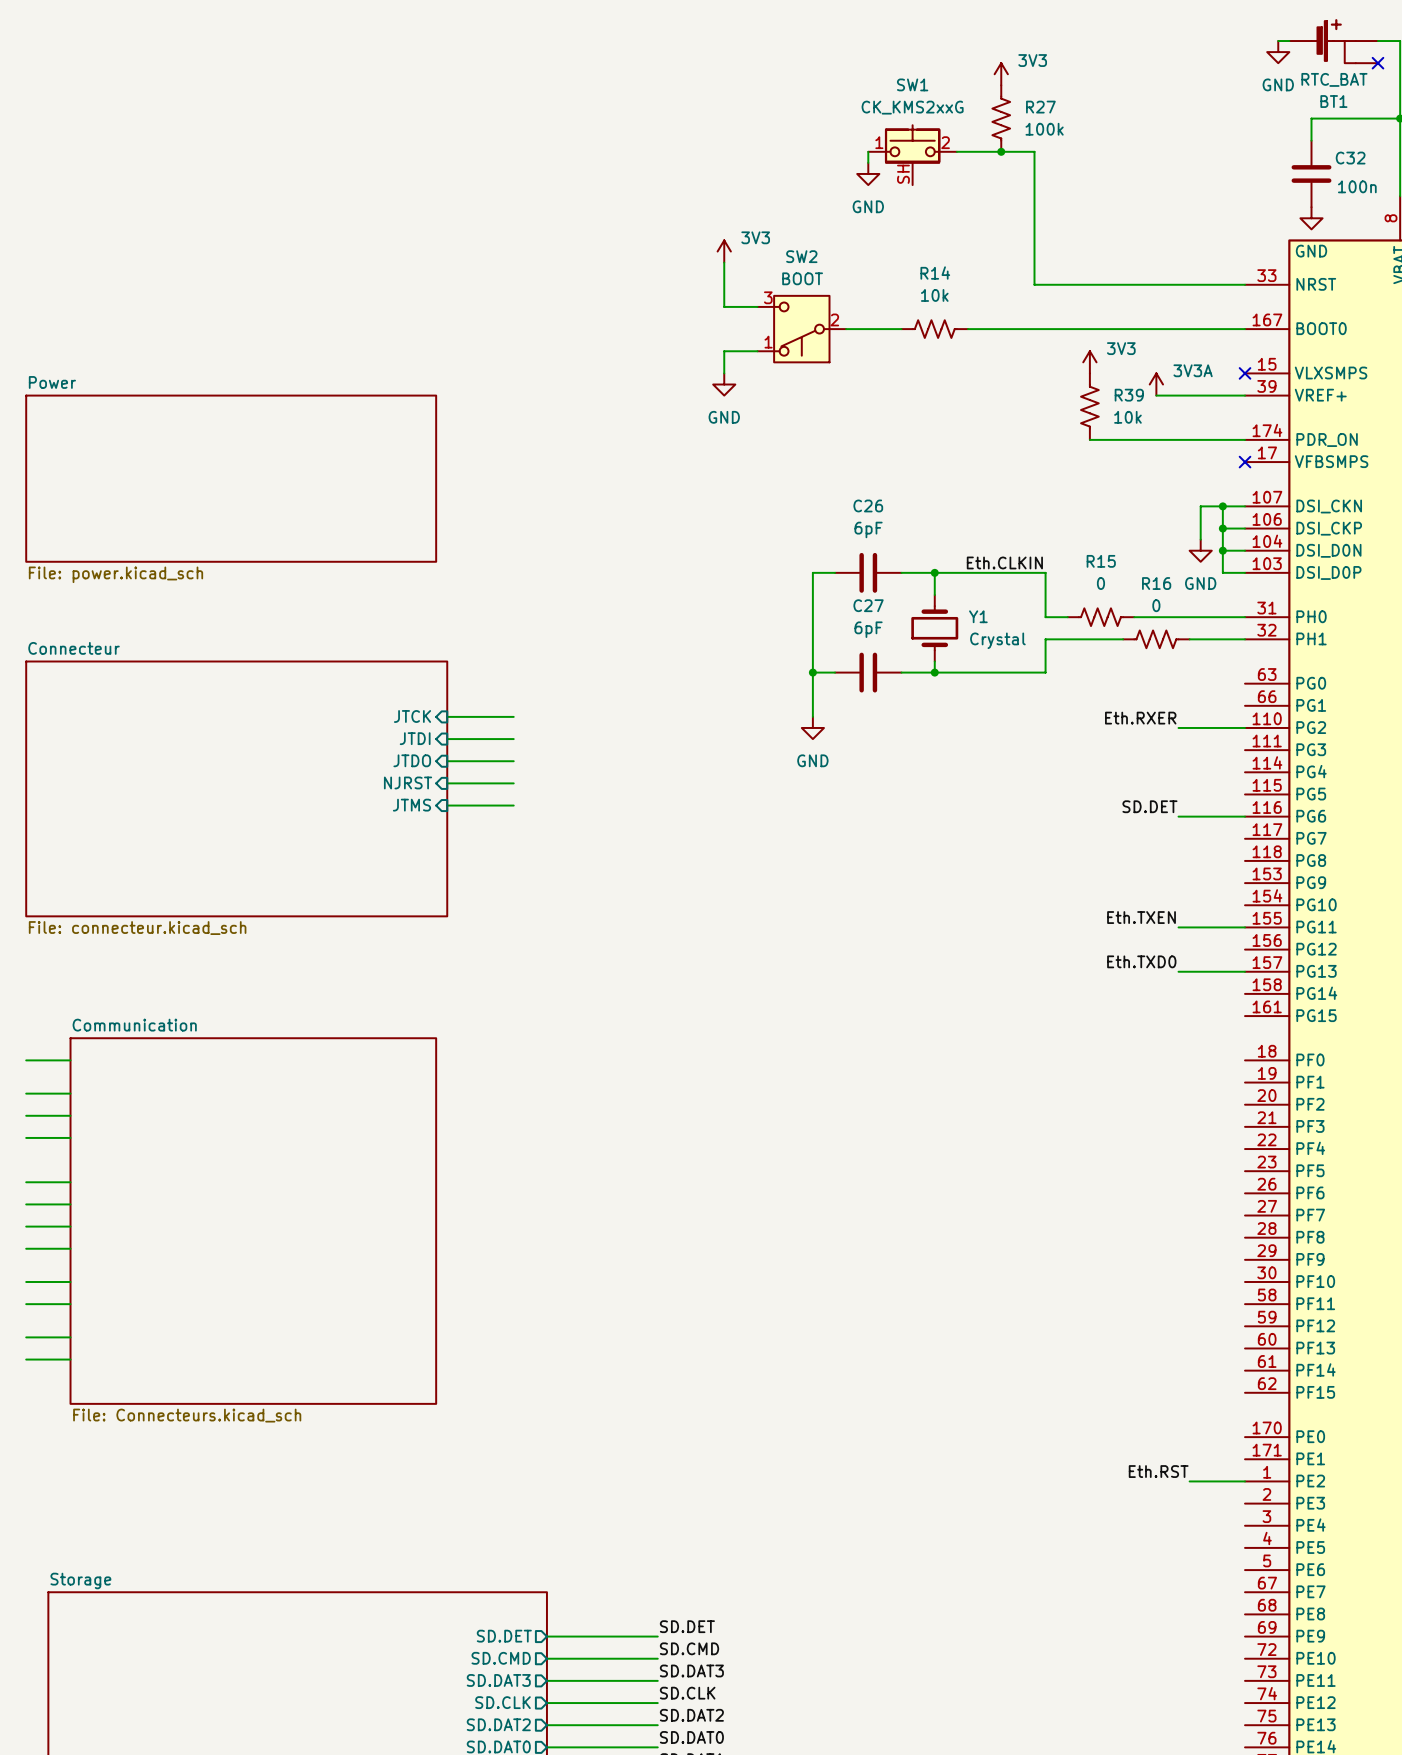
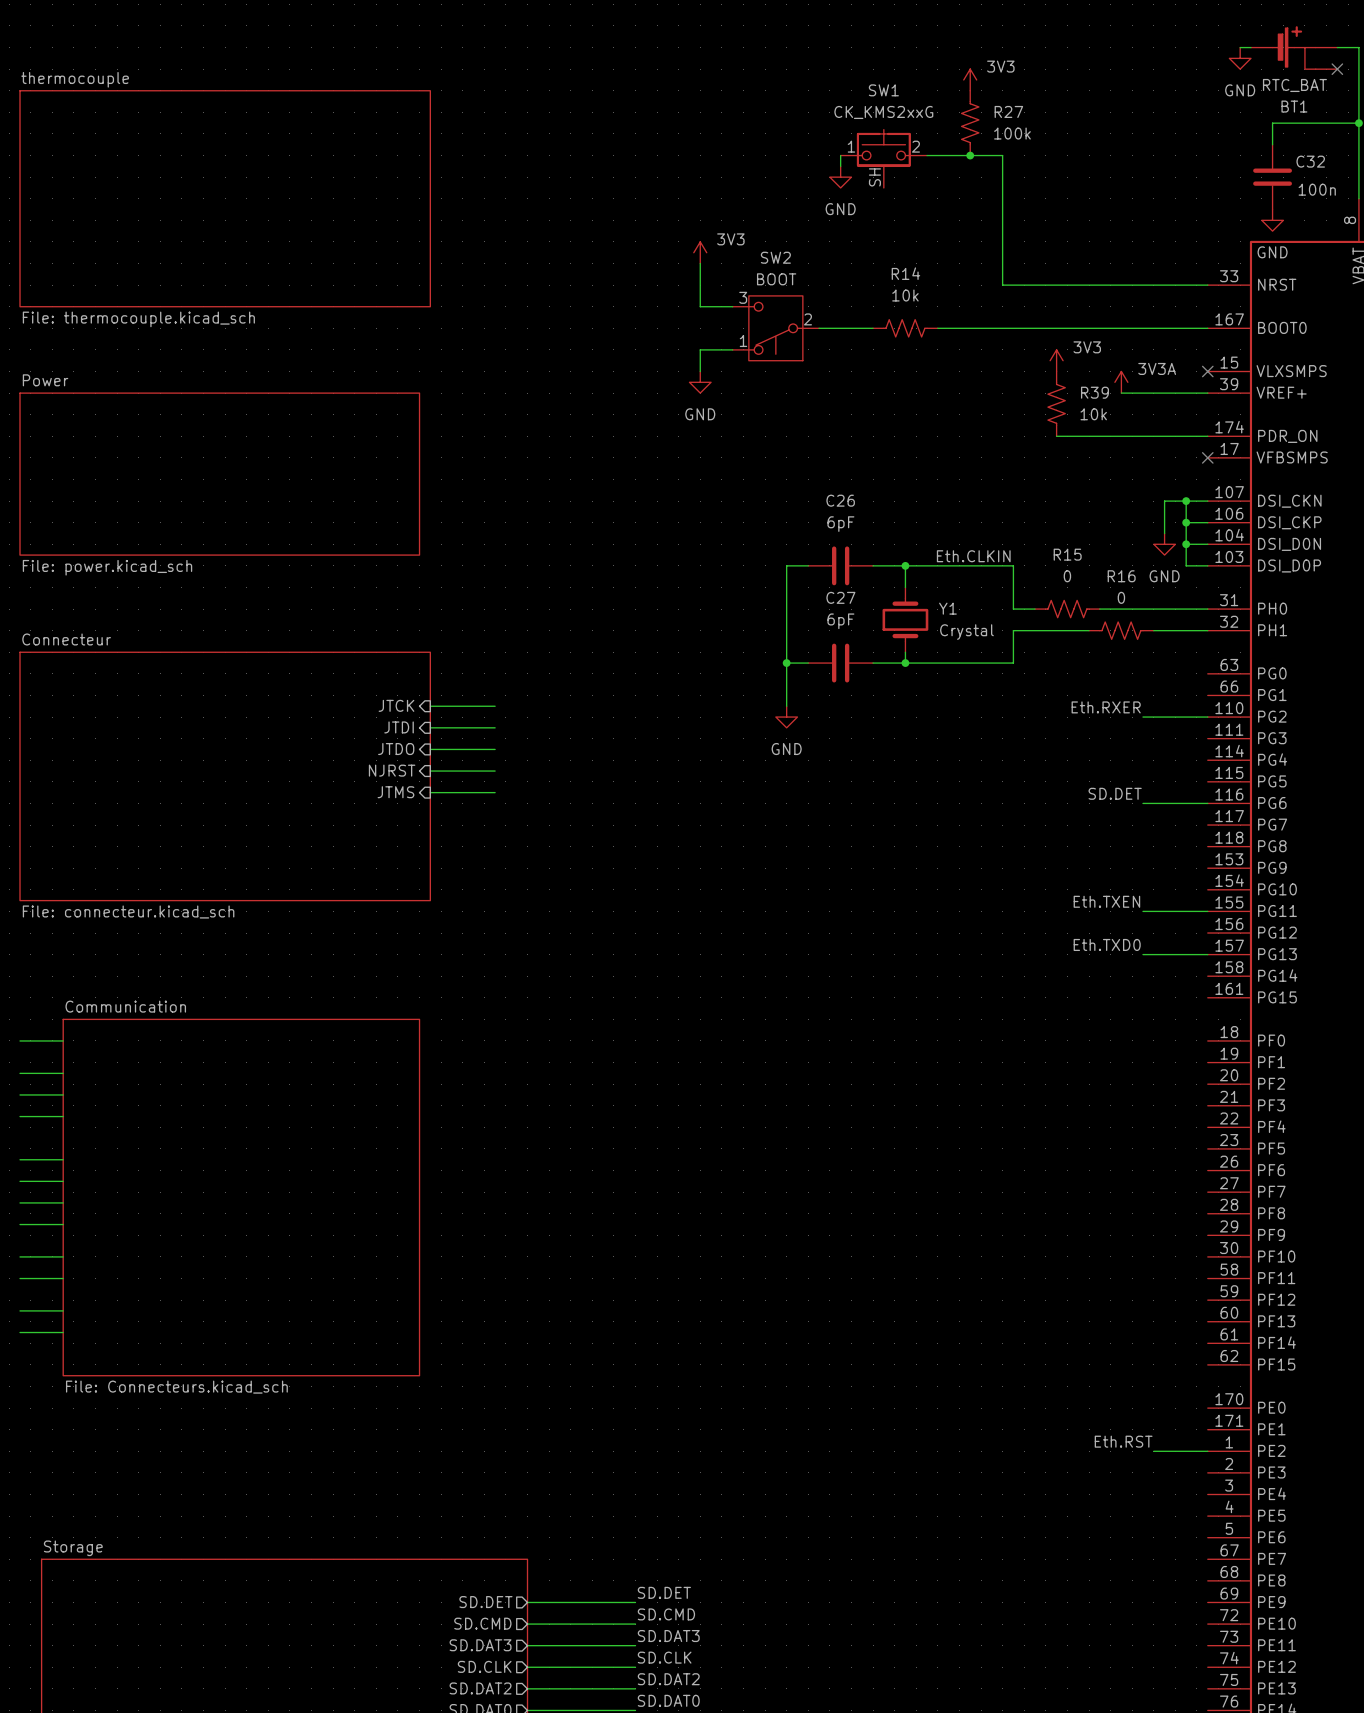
sheet thermocouple: none -> File: thermocouple.kicad_sch (225, 198)

